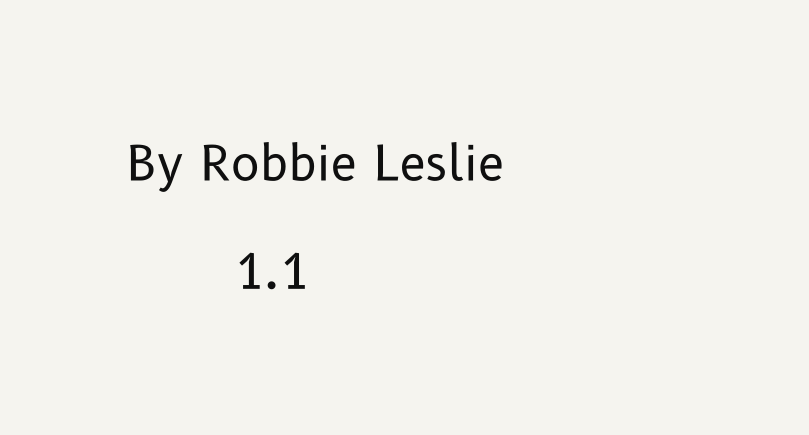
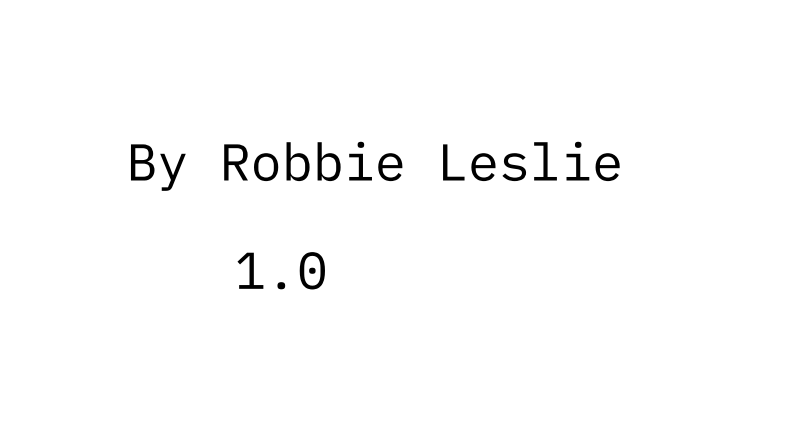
label: 1.1 (272, 270) -> 1.0 (281, 270)

